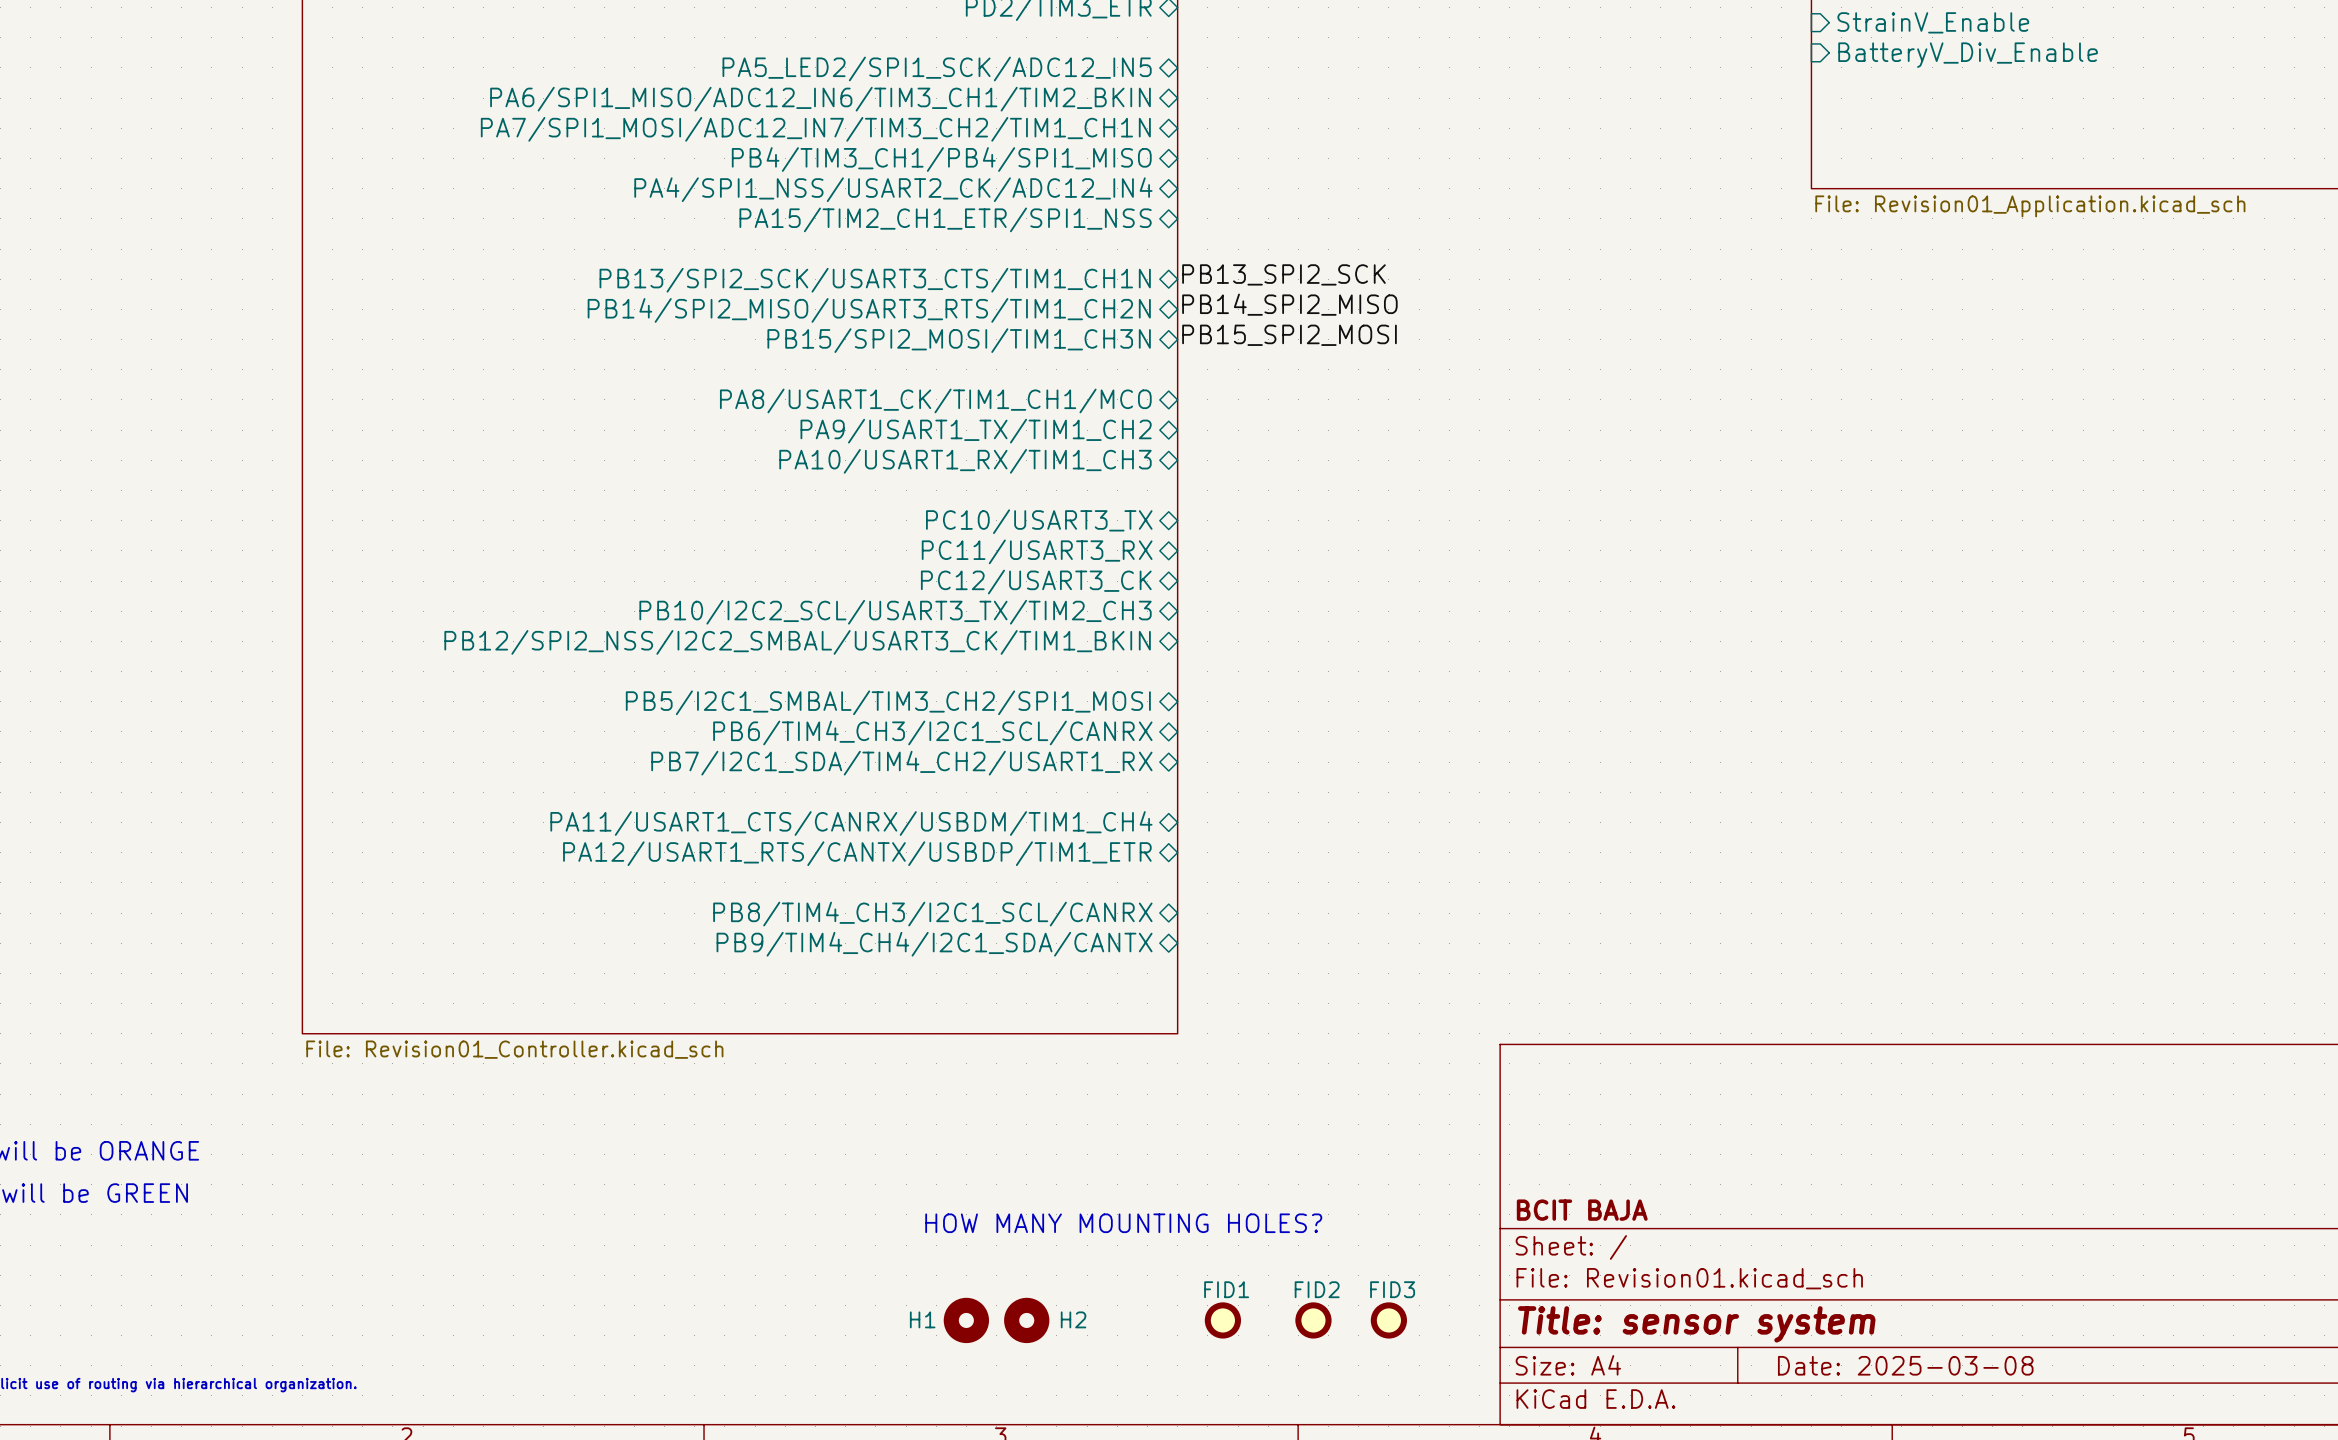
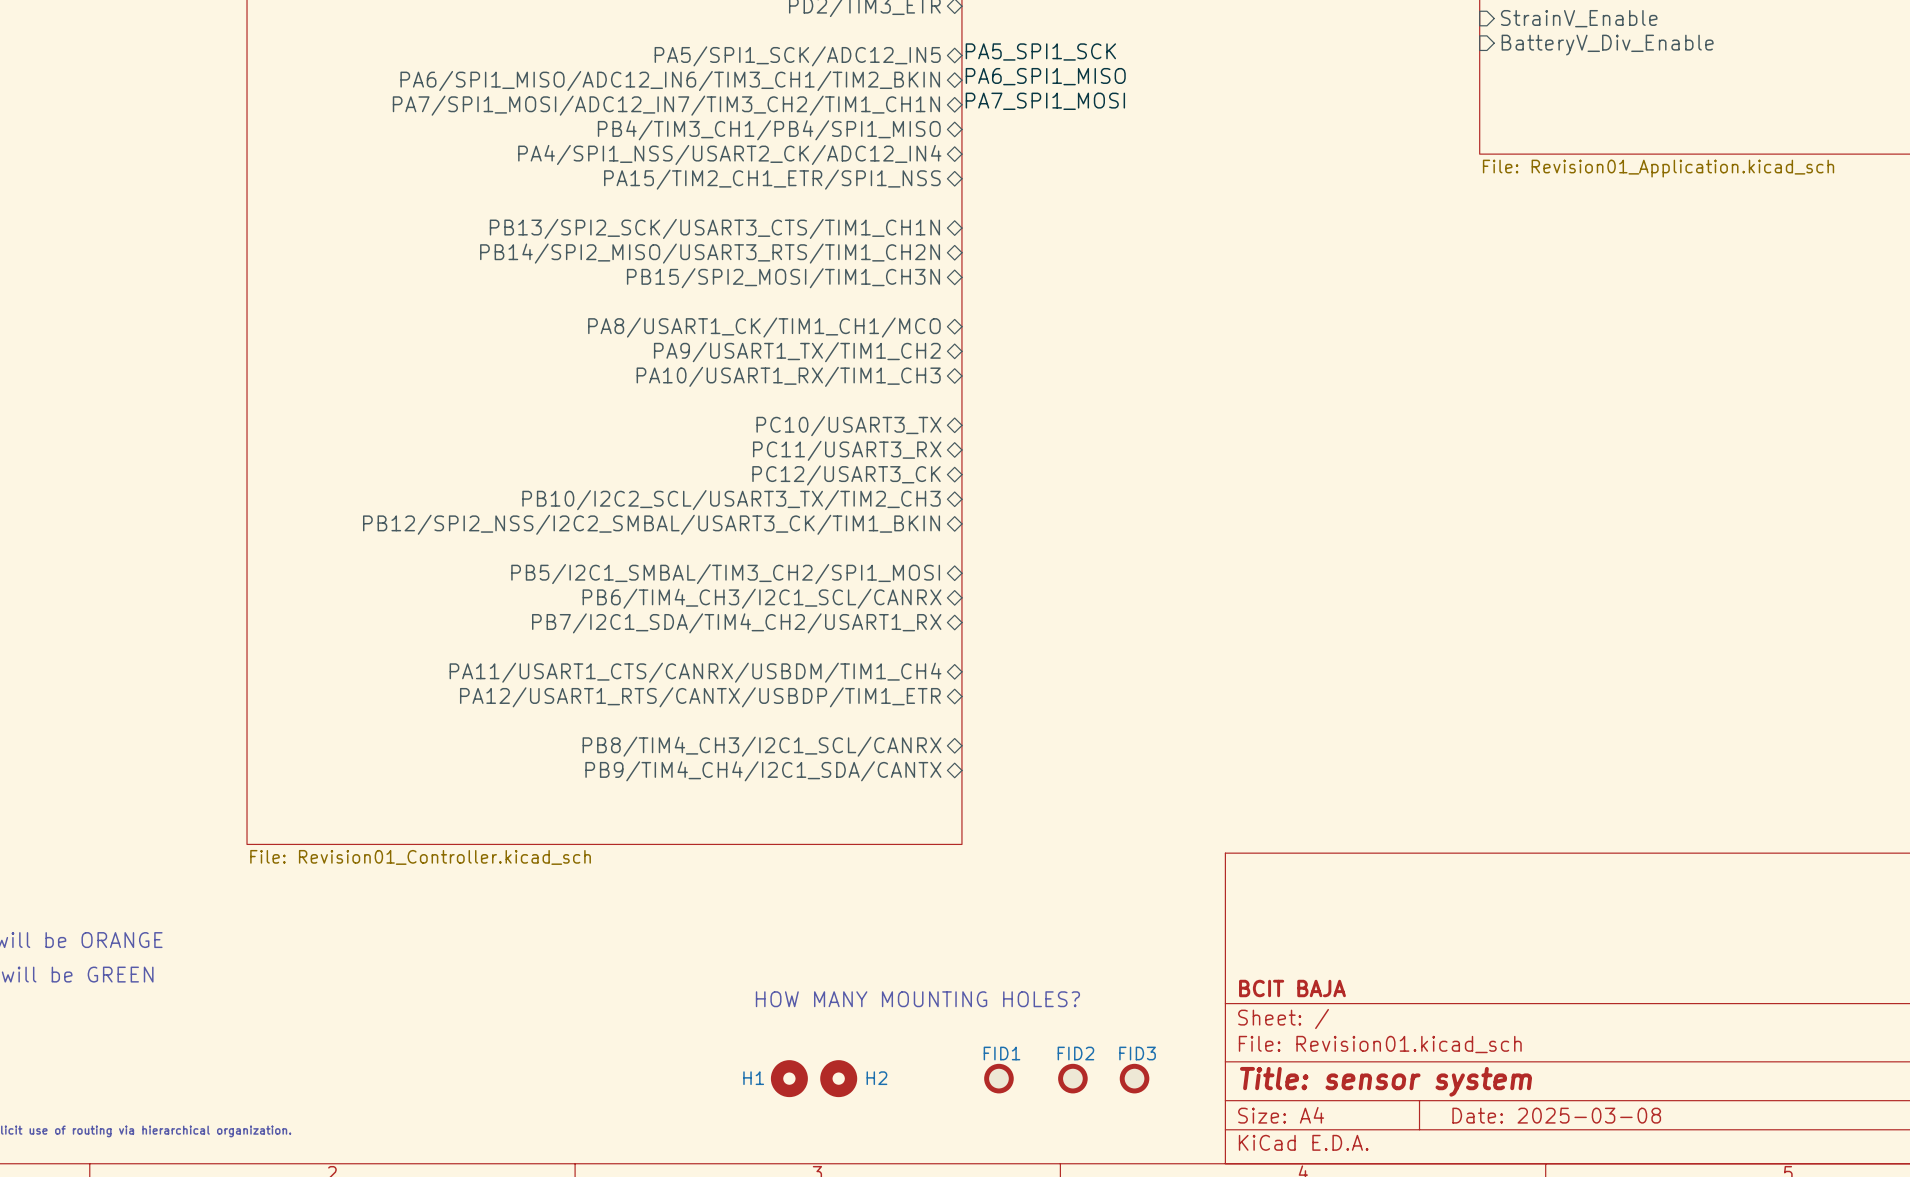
label: none -> PA5_SPI1_SCK (1040, 51)
sheet pin: PA5_LED2/SPI1_SCK/ADC12_IN5 (937, 68) -> PA5/SPI1_SCK/ADC12_IN5 (797, 56)
label: none -> PA6_SPI1_MISO (1045, 76)
label: none -> PA7_SPI1_MOSI (1045, 101)
label: PB13_SPI2_SCK (1283, 274) -> none
label: PB14_SPI2_MISO (1289, 304) -> none
label: PB15_SPI2_MOSI (1289, 335) -> none

